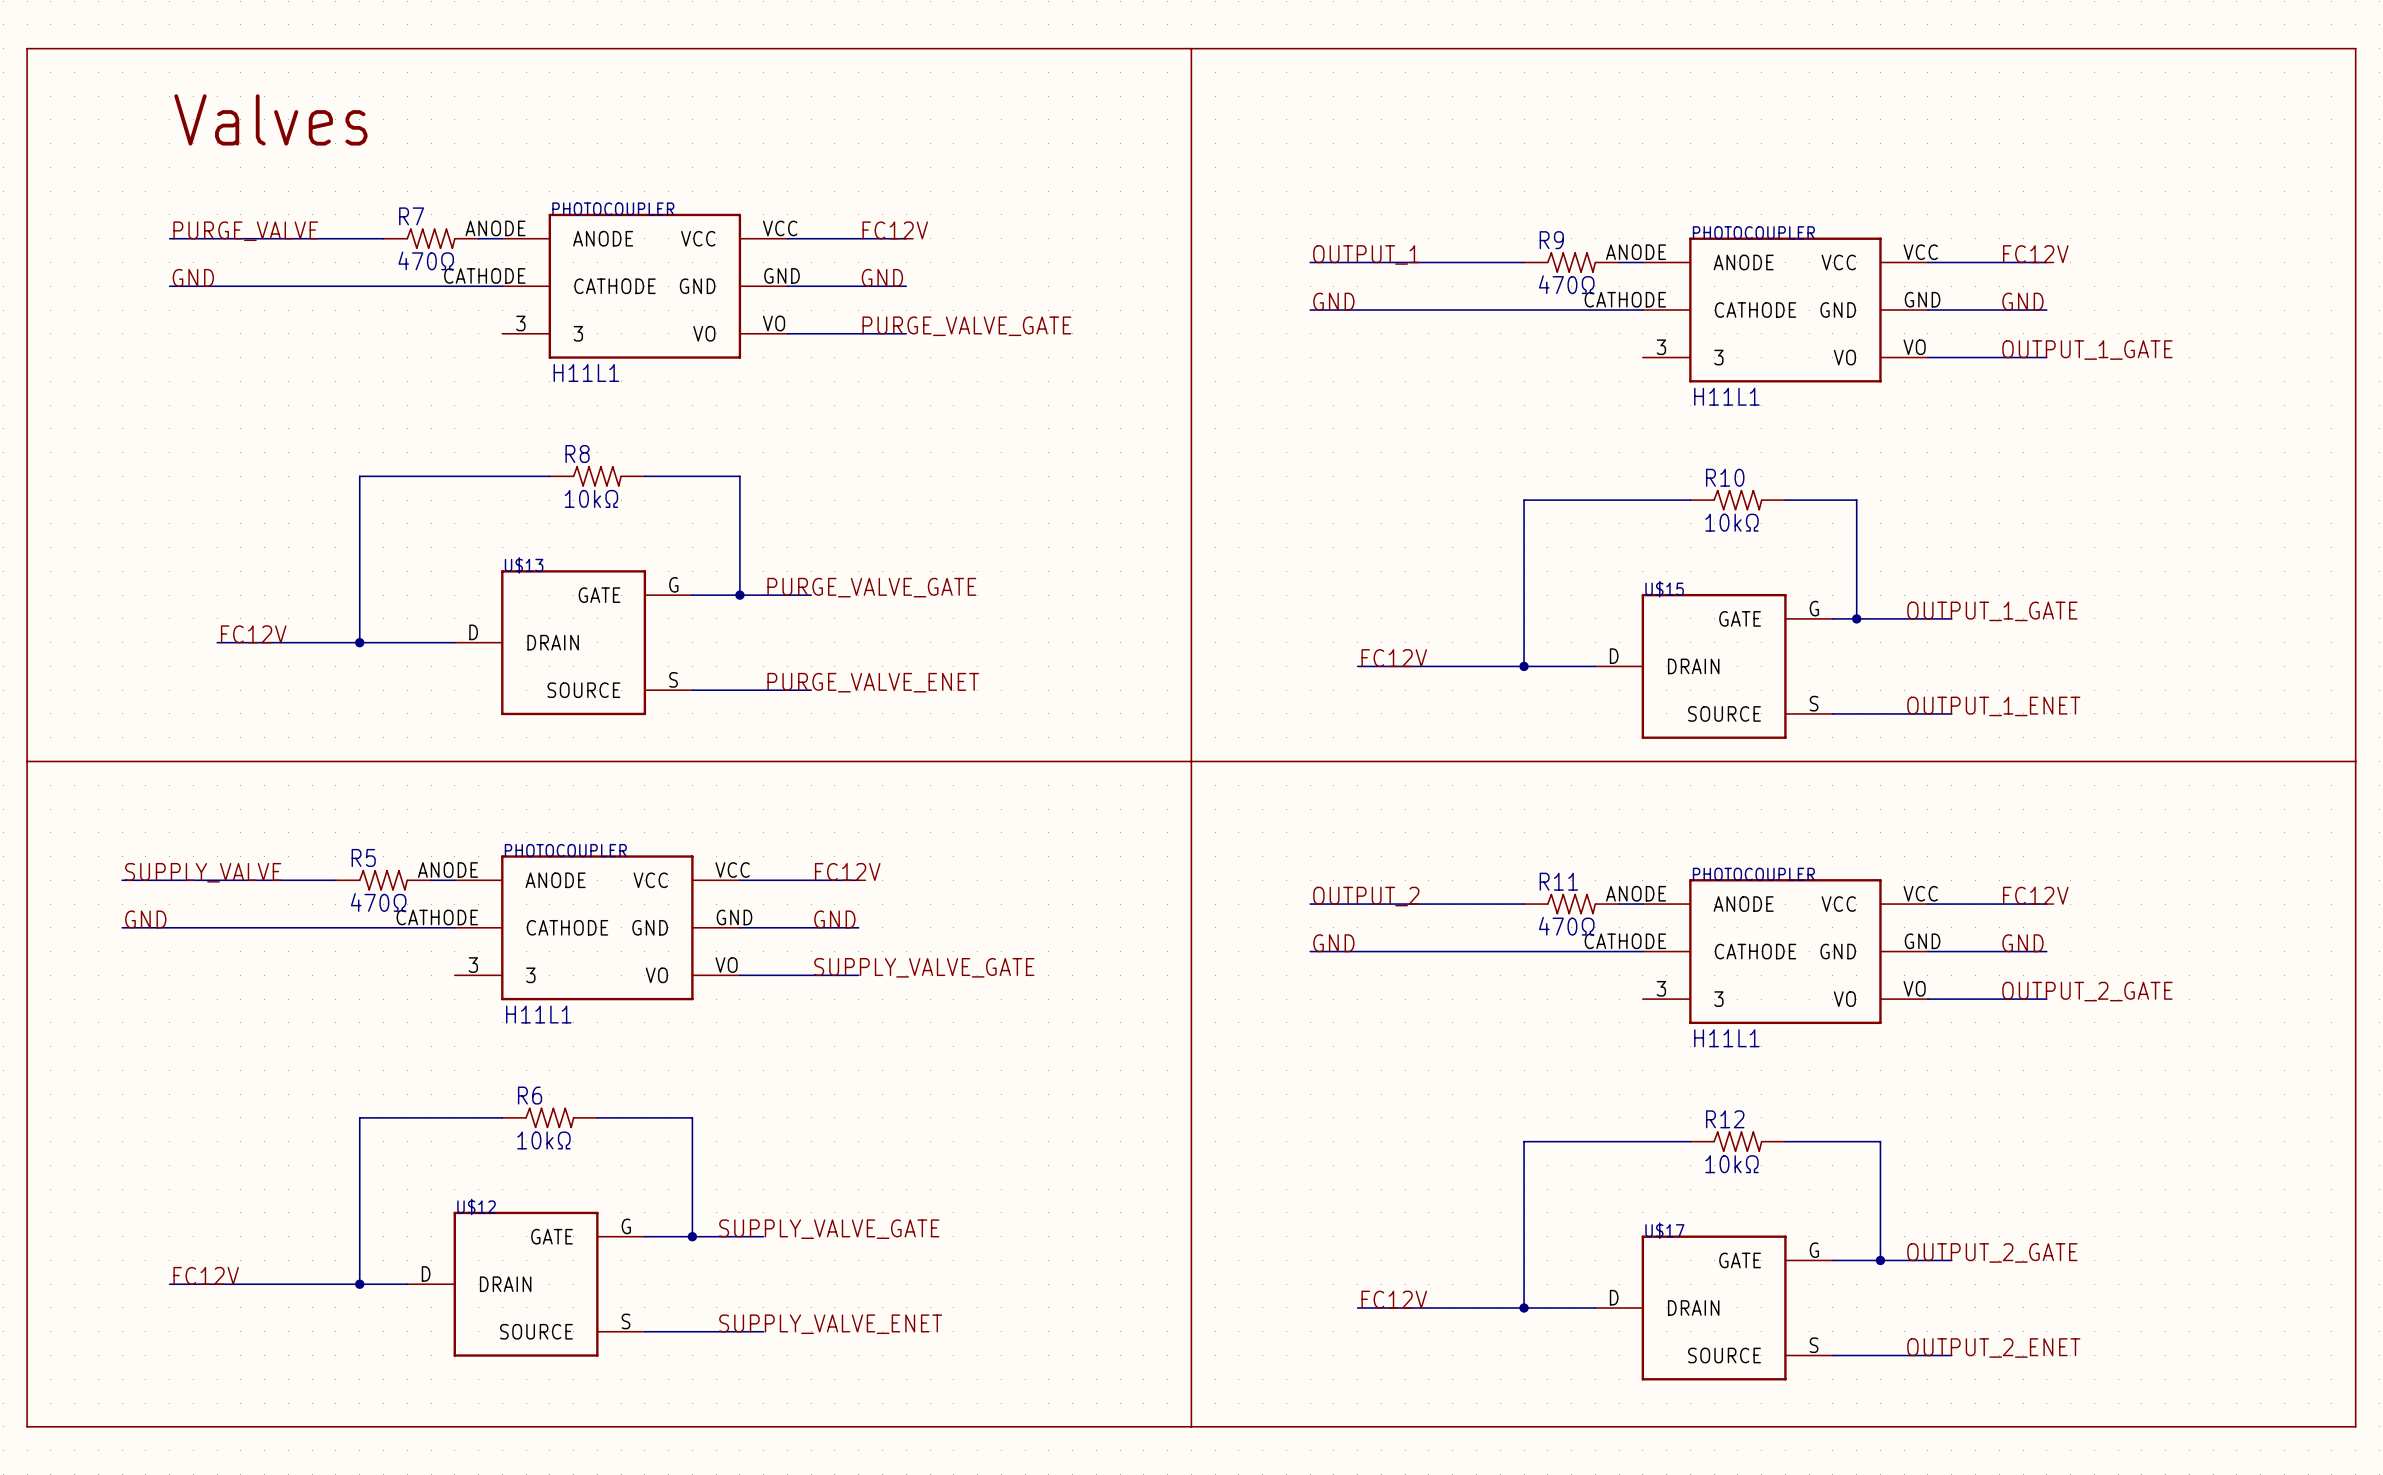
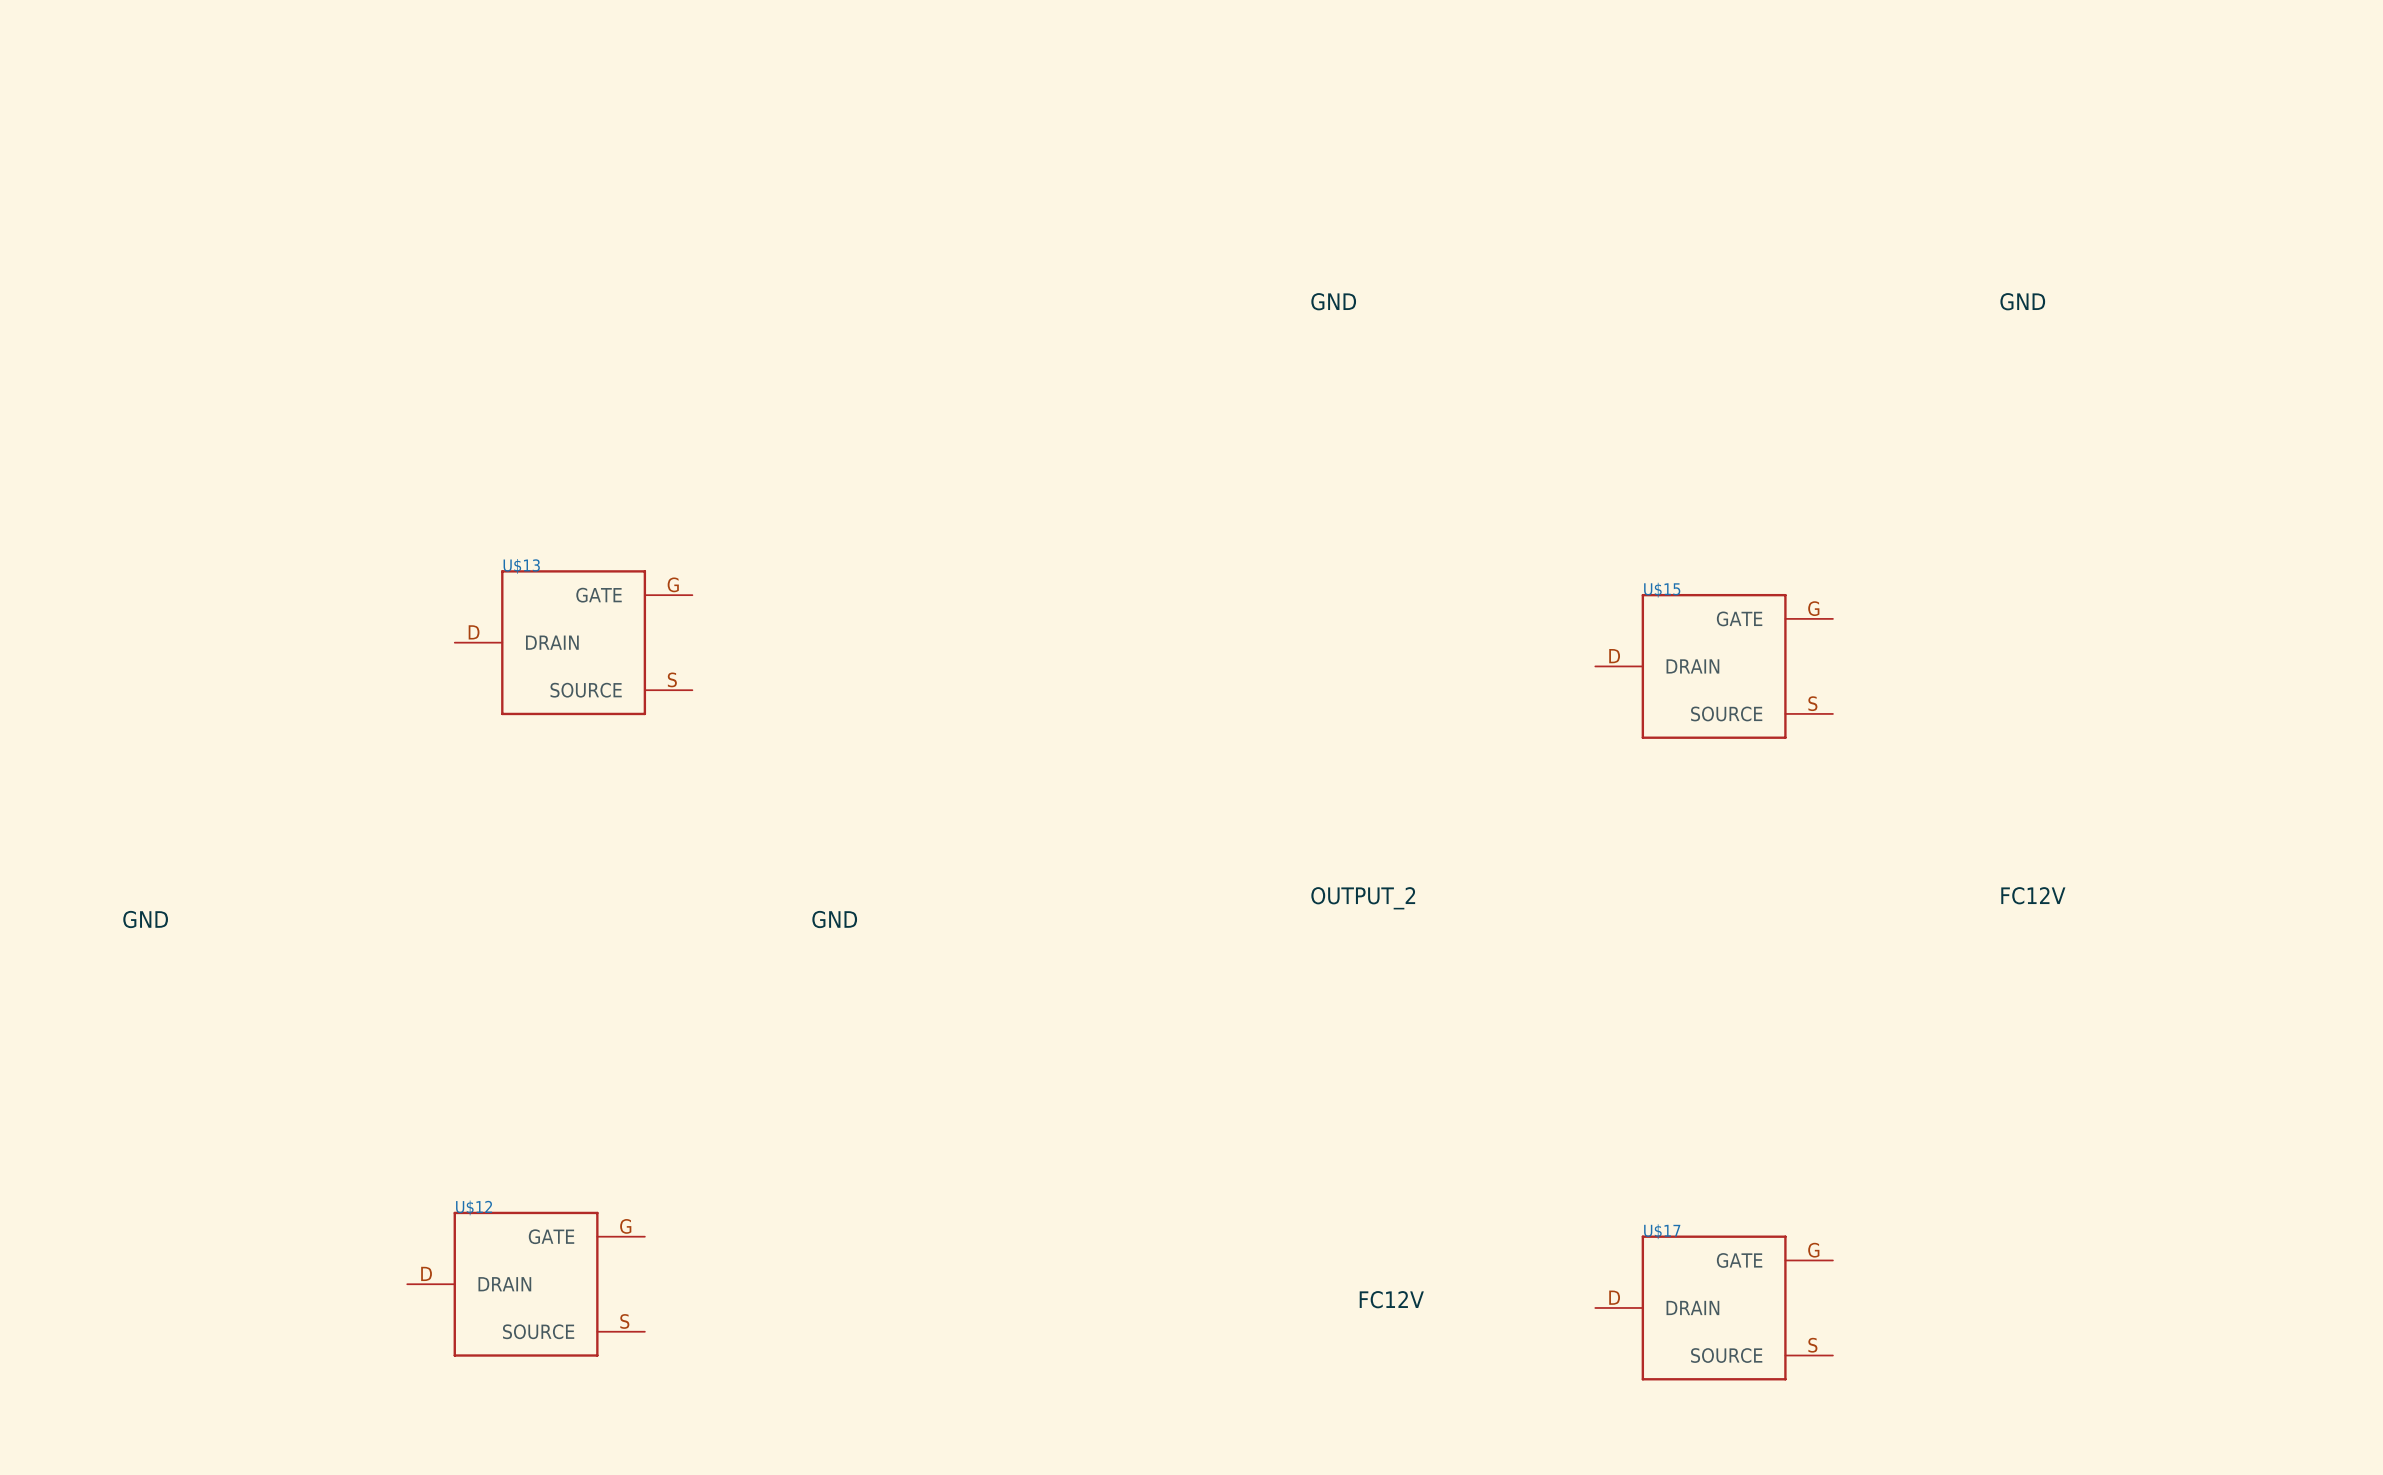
line: (27, 48) (27, 1426) (2355, 1426) (2355, 48) (27, 48) -> none
line: (1191, 48) (1191, 1426) -> none
text: Valves (270, 119) -> none
label: FC12V (895, 230) -> none
label: PURGE_VALVE (245, 231) -> none
wire: (169, 238) (383, 238) -> none
R7: 470Ω (431, 238) -> none
wire: (478, 238) (502, 238) -> none
wire: (787, 238) (906, 238) -> none
label: OUTPUT_1 (1366, 254) -> none
label: FC12V (2035, 254) -> none
wire: (1310, 262) (1524, 262) -> none
R9: 470Ω (1571, 262) -> none
wire: (1619, 262) (1642, 262) -> none
wire: (1927, 262) (2046, 262) -> none
label: GND (193, 277) -> none
label: GND (882, 277) -> none
wire: (169, 286) (502, 286) -> none
part: (644, 286) -> none
wire: (787, 286) (906, 286) -> none
wire: (1310, 310) (1642, 310) -> none
part: (1785, 310) -> none
wire: (1927, 310) (2046, 310) -> none
label: PURGE_VALVE_GATE (966, 326) -> none
wire: (787, 333) (906, 333) -> none
label: OUTPUT_1_GATE (2087, 350) -> none
wire: (1927, 357) (2046, 357) -> none
wire: (549, 476) (359, 476) (359, 642) -> none
R8: 10kΩ (597, 476) -> none
wire: (644, 476) (739, 476) (739, 595) -> none
wire: (1690, 500) (1524, 500) (1524, 666) -> none
R10: 10kΩ (1737, 500) -> none
wire: (1785, 500) (1856, 500) (1856, 618) -> none
label: PURGE_VALVE_GATE (871, 587) -> none
wire: (692, 595) (811, 595) -> none
junction: (739, 595) -> none
label: OUTPUT_1_GATE (1992, 611) -> none
wire: (1832, 618) (1951, 618) -> none
junction: (1856, 618) -> none
label: FC12V (253, 634) -> none
wire: (217, 642) (454, 642) -> none
junction: (359, 642) -> none
label: FC12V (1394, 658) -> none
wire: (1357, 666) (1595, 666) -> none
junction: (1524, 666) -> none
label: PURGE_VALVE_ENET (873, 682) -> none
wire: (692, 690) (811, 690) -> none
label: OUTPUT_1_ENET (1993, 706) -> none
wire: (1832, 713) (1951, 713) -> none
line: (27, 761) (2355, 761) -> none
label: FC12V (847, 871) -> none
label: SUPPLY_VALVE (203, 872) -> none
wire: (122, 880) (335, 880) -> none
R5: 470Ω (383, 880) -> none
wire: (431, 880) (454, 880) -> none
wire: (739, 880) (858, 880) -> none
wire: (1310, 904) (1524, 904) -> none
R11: 470Ω (1571, 904) -> none
wire: (1619, 904) (1642, 904) -> none
wire: (1927, 904) (2046, 904) -> none
wire: (122, 927) (454, 927) -> none
part: (597, 927) -> none
wire: (739, 927) (858, 927) -> none
label: GND (1333, 943) -> none
label: GND (2022, 943) -> none
wire: (1310, 951) (1642, 951) -> none
part: (1785, 951) -> none
wire: (1927, 951) (2046, 951) -> none
label: SUPPLY_VALVE_GATE (924, 967) -> none
wire: (739, 975) (858, 975) -> none
label: OUTPUT_2_GATE (2087, 991) -> none
wire: (1927, 999) (2046, 999) -> none
wire: (502, 1117) (359, 1117) (359, 1284) -> none
R6: 10kΩ (549, 1117) -> none
wire: (597, 1117) (692, 1117) (692, 1236) -> none
wire: (1690, 1141) (1524, 1141) (1524, 1307) -> none
R12: 10kΩ (1737, 1141) -> none
wire: (1785, 1141) (1880, 1141) (1880, 1260) -> none
label: SUPPLY_VALVE_GATE (829, 1229) -> none
wire: (644, 1236) (763, 1236) -> none
junction: (692, 1236) -> none
label: OUTPUT_2_GATE (1992, 1252) -> none
wire: (1832, 1260) (1951, 1260) -> none
junction: (1880, 1260) -> none
label: FC12V (206, 1275) -> none
wire: (169, 1284) (407, 1284) -> none
junction: (359, 1284) -> none
wire: (1357, 1307) (1595, 1307) -> none
junction: (1524, 1307) -> none
label: SUPPLY_VALVE_ENET (830, 1324) -> none
wire: (644, 1331) (763, 1331) -> none
label: OUTPUT_2_ENET (1993, 1347) -> none
wire: (1832, 1355) (1951, 1355) -> none

